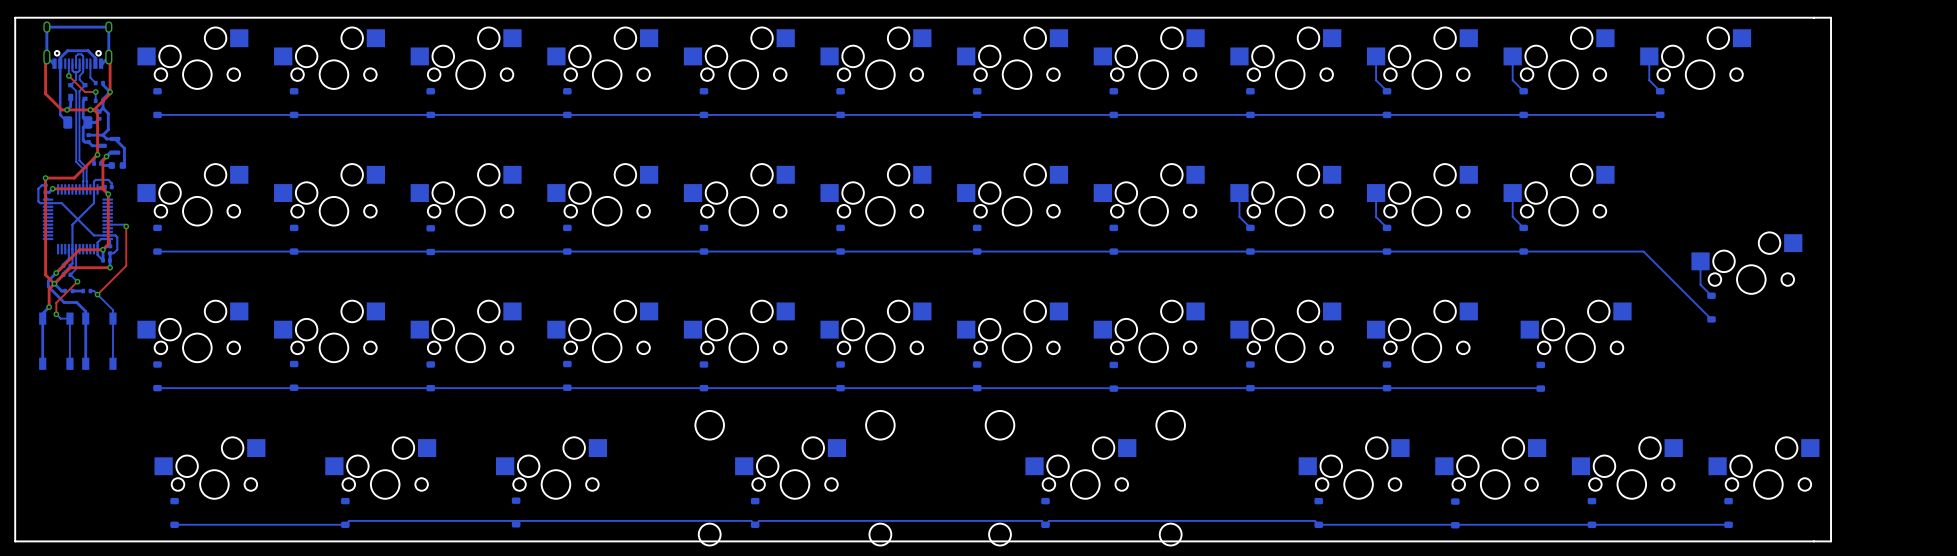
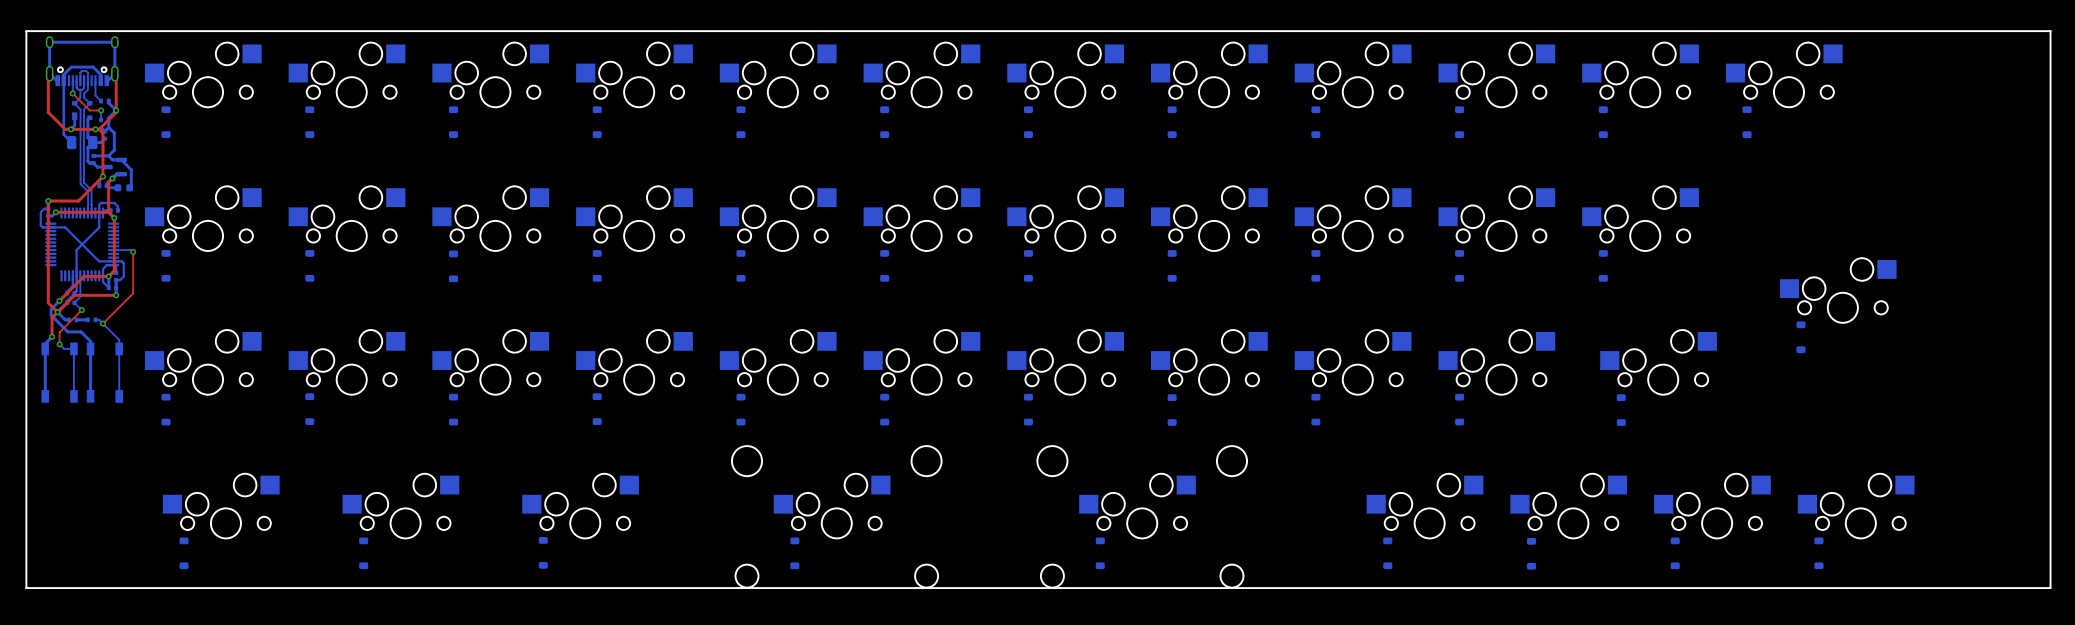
board edge: (15, 17) (15, 541) (1831, 541) (1831, 17) (15, 17) -> (26, 31) (26, 588) (2050, 588) (2050, 31) (26, 31)
bottom track: (1376, 56) (1376, 80) (1387, 91) -> none
bottom track: (1512, 56) (1512, 80) (1523, 91) -> none
bottom track: (1649, 56) (1649, 80) (1660, 91) -> none
bottom track: (157, 114) (1660, 114) -> none
bottom track: (1239, 193) (1239, 216) (1250, 227) -> none
bottom track: (1376, 193) (1376, 216) (1387, 227) -> none
bottom track: (1512, 193) (1512, 216) (1523, 227) -> none
bottom track: (157, 251) (1643, 251) (1711, 319) -> none
bottom track: (1700, 261) (1700, 284) (1711, 295) -> none
bottom track: (157, 388) (1540, 388) -> none
bottom track: (174, 524) (345, 524) (349, 520) (751, 520) (755, 524) (759, 520) (1041, 520) (1045, 524) (1049, 520) (1314, 520) (1318, 524) (1728, 524) -> none

